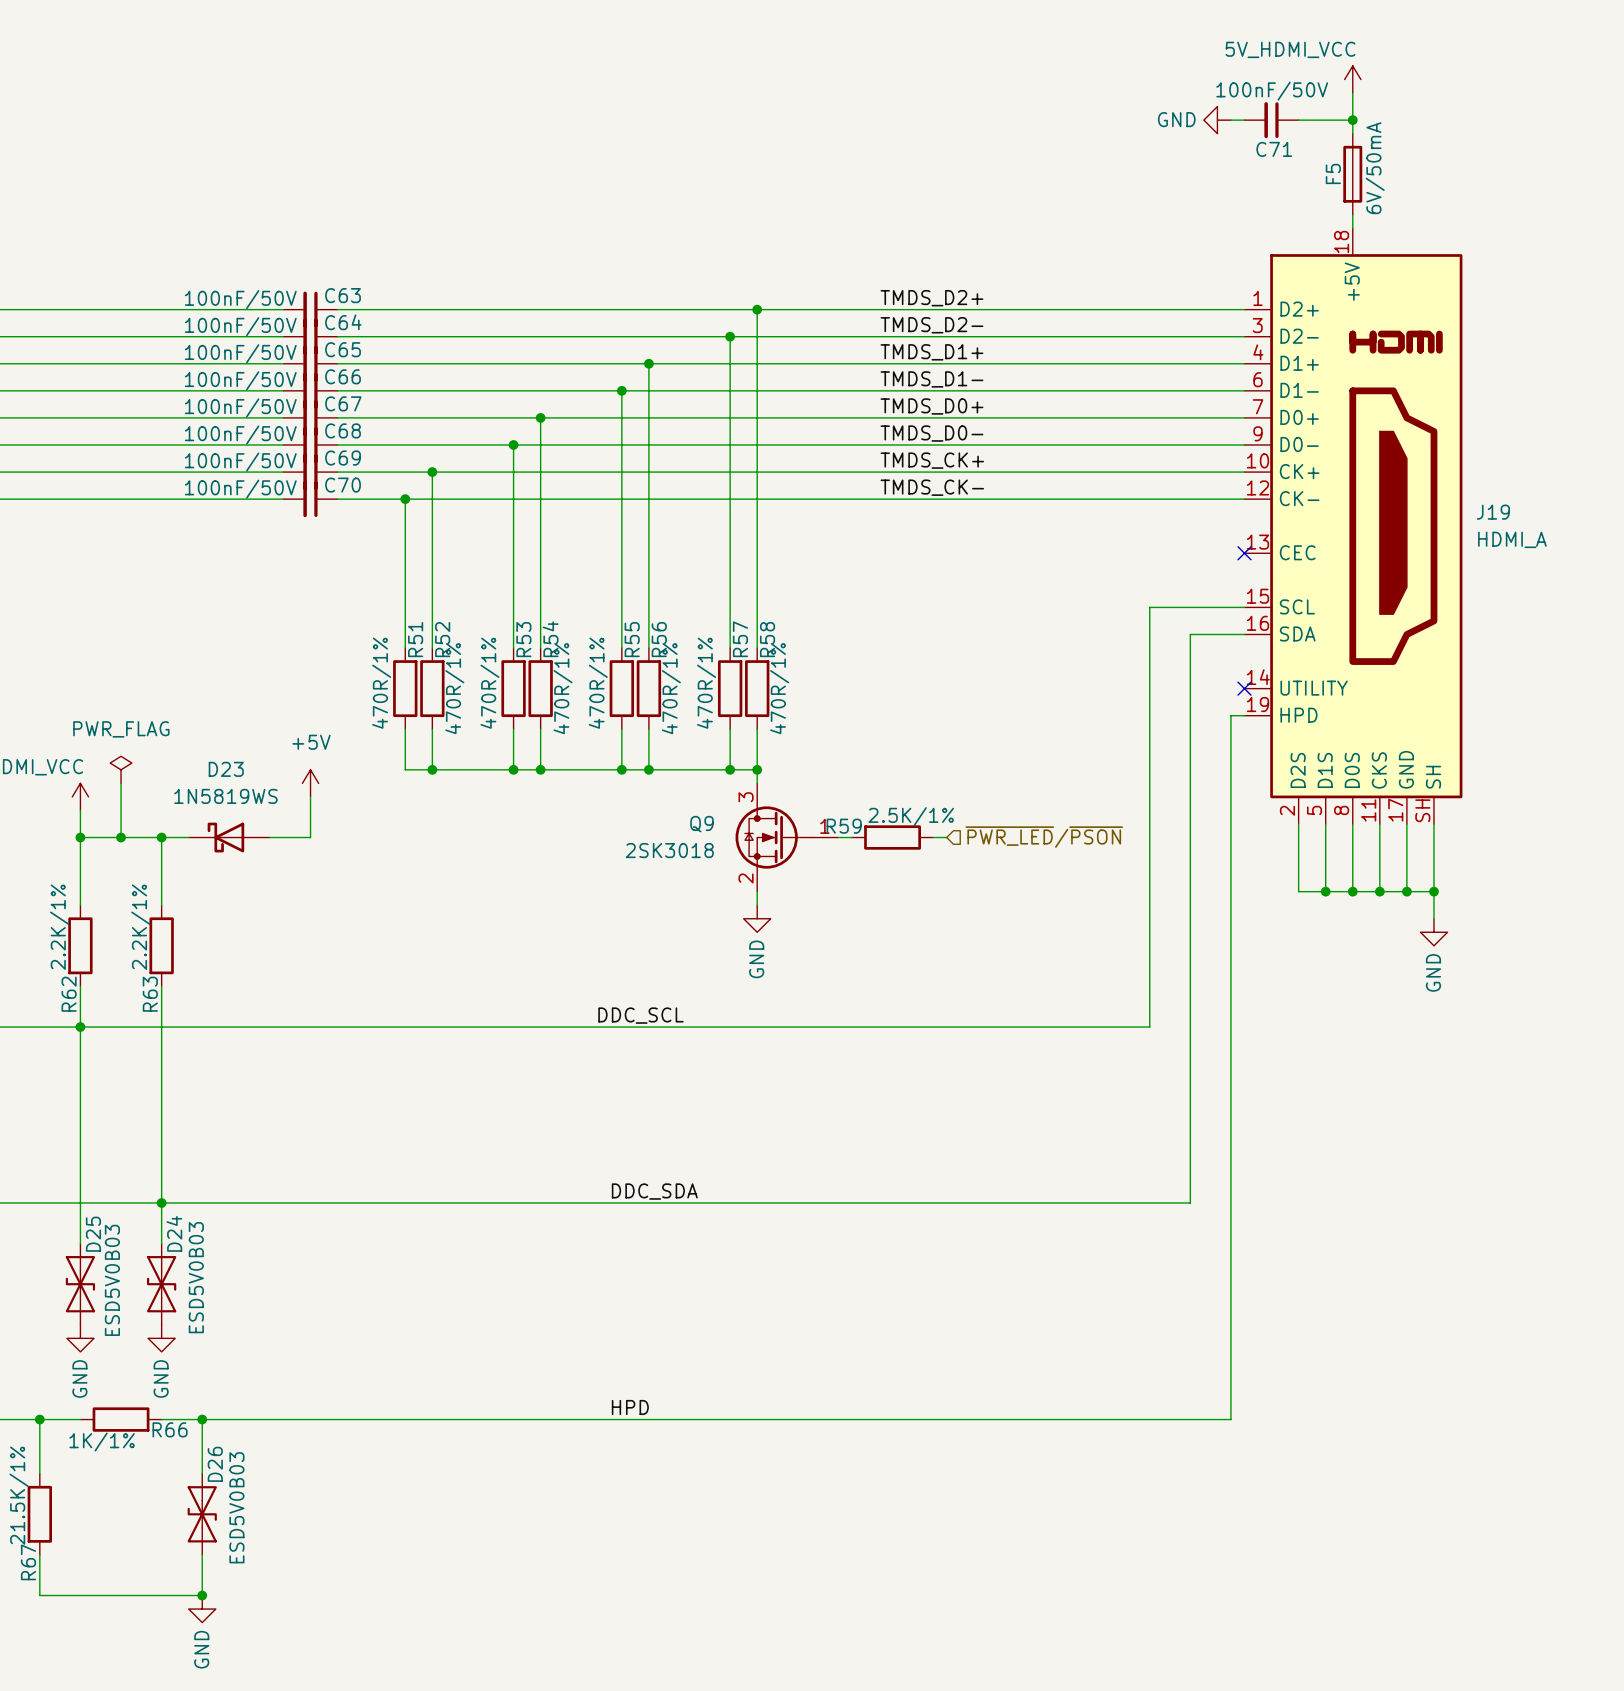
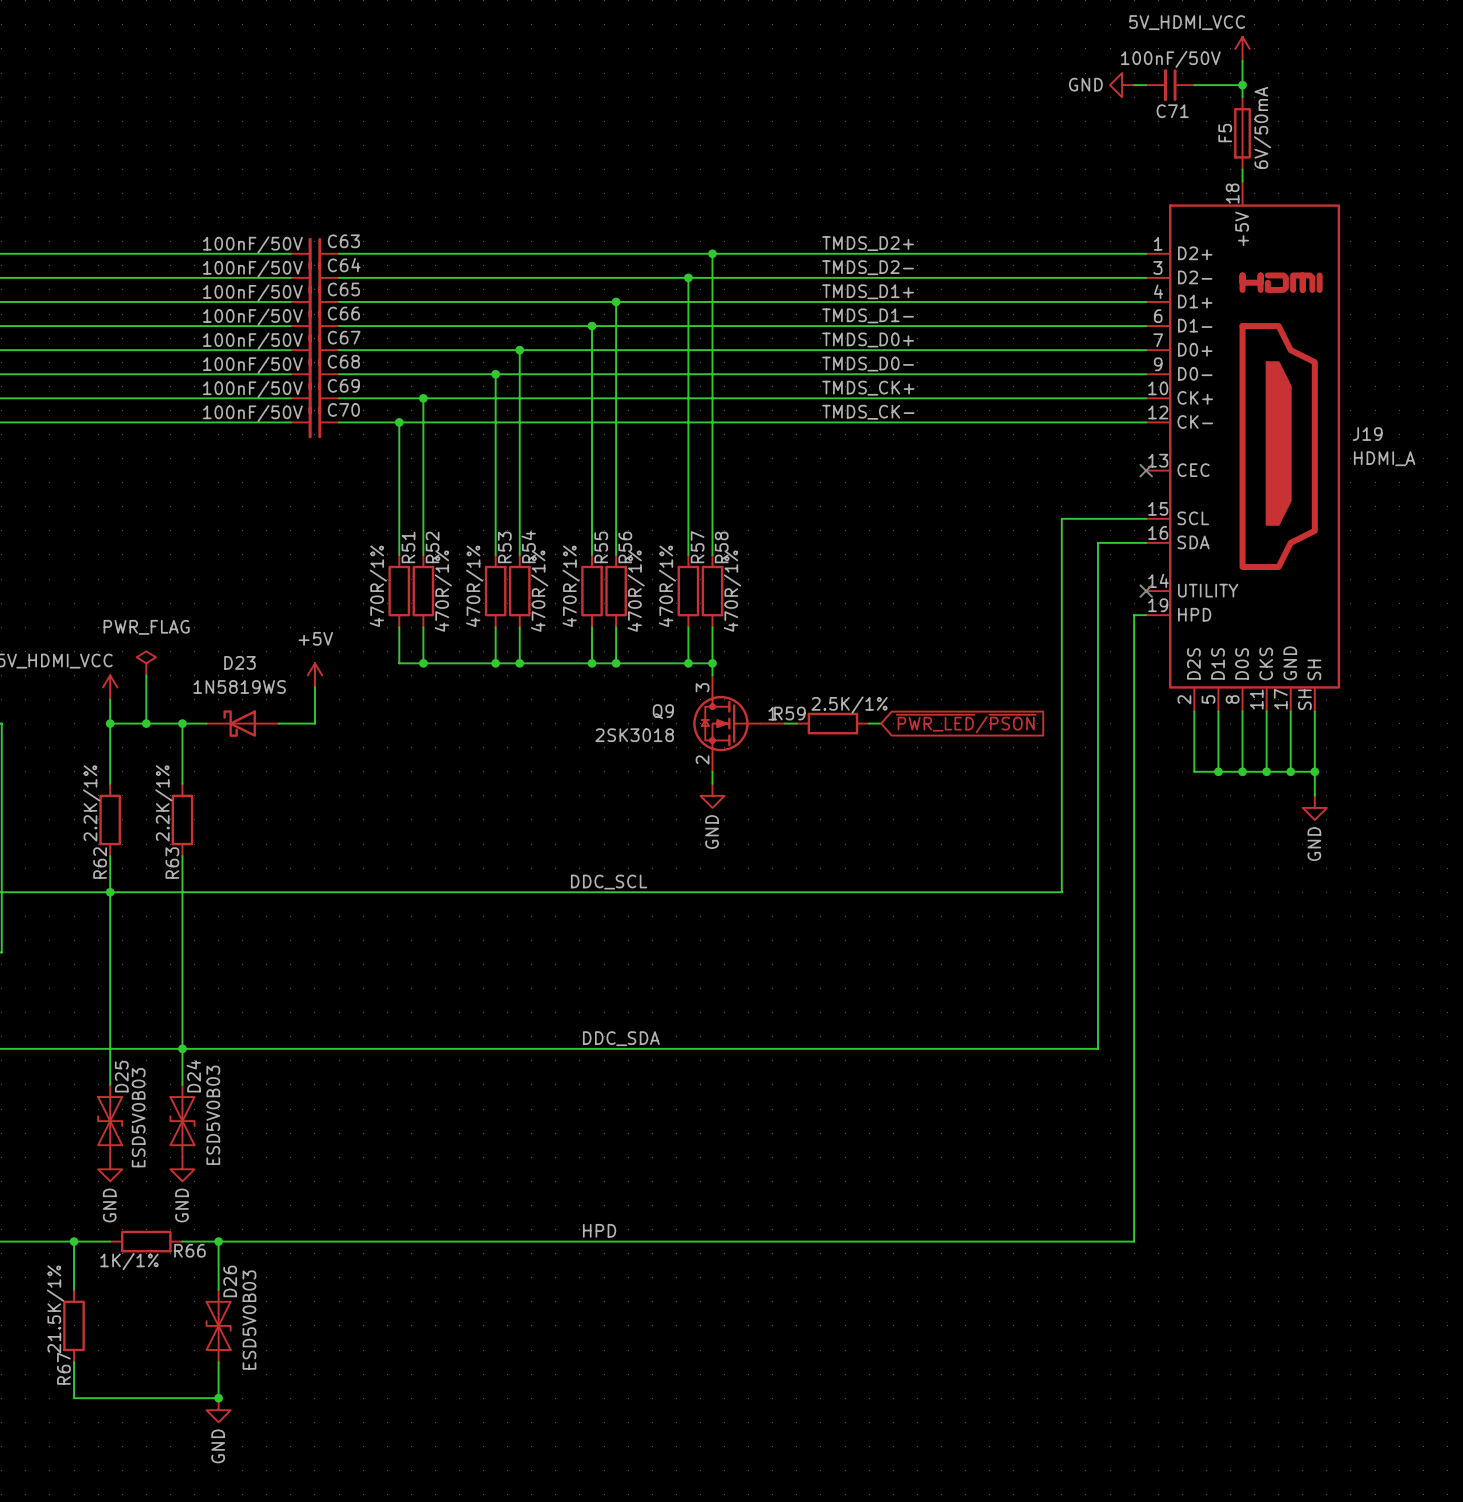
global label: none -> ~{PWR_LED}/~{PSON} (966, 723)
hierarchical label: ~{PWR_LED}/~{PSON} (1044, 837) -> none

